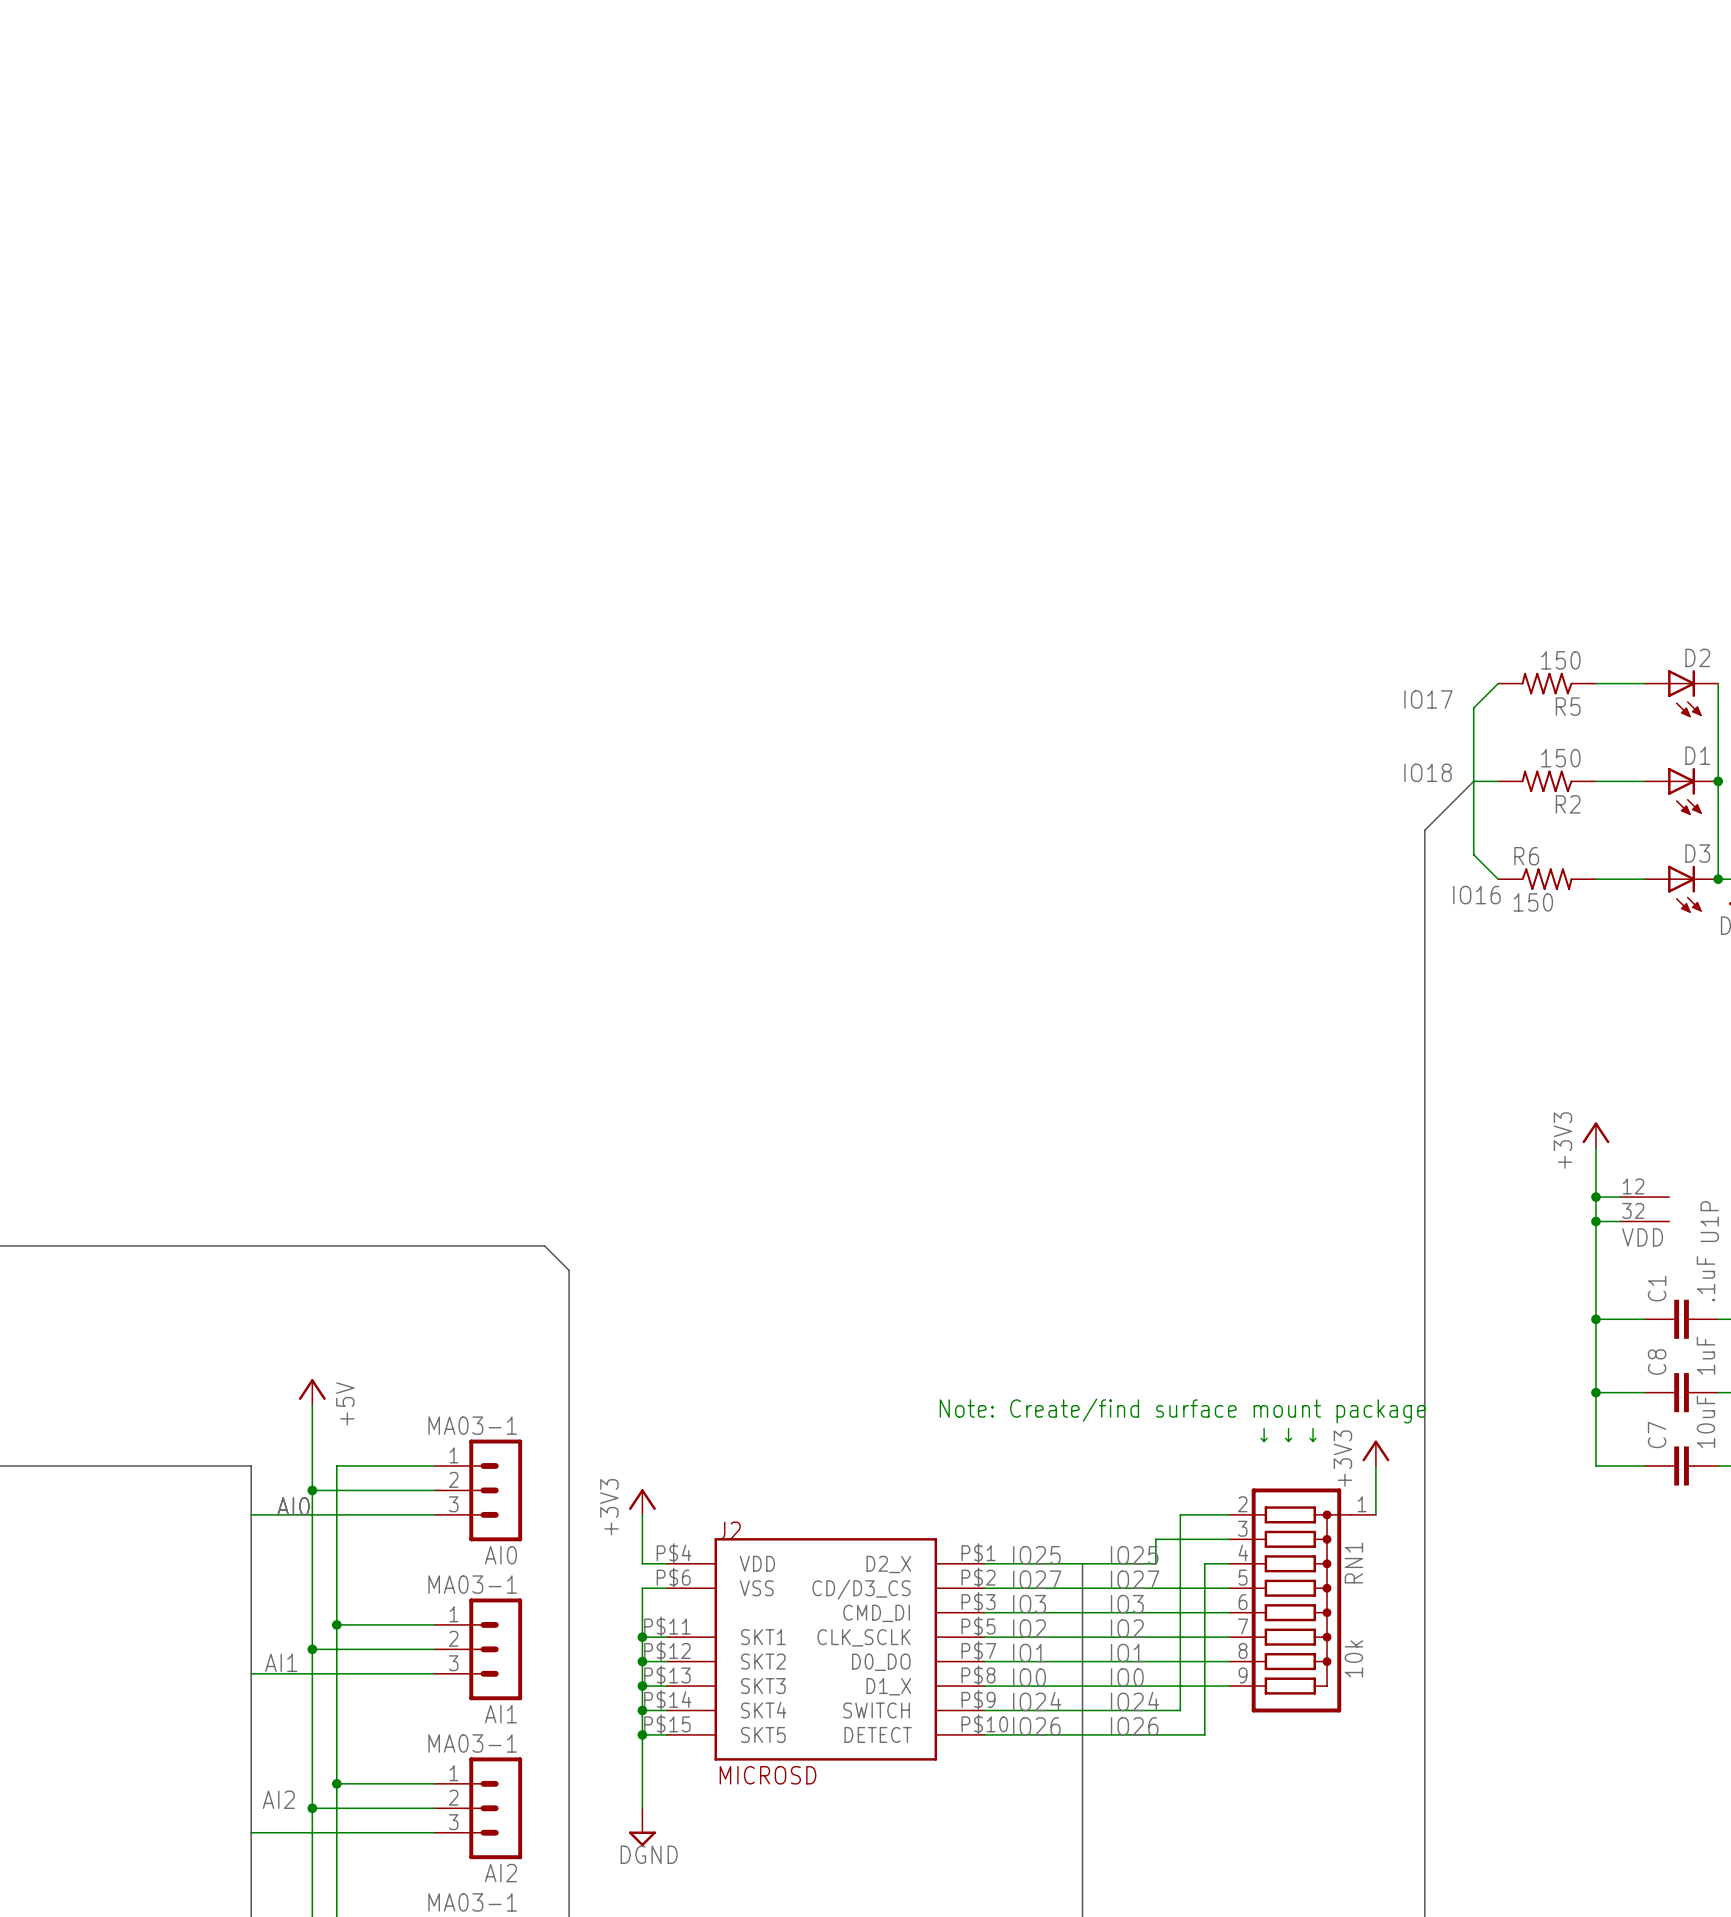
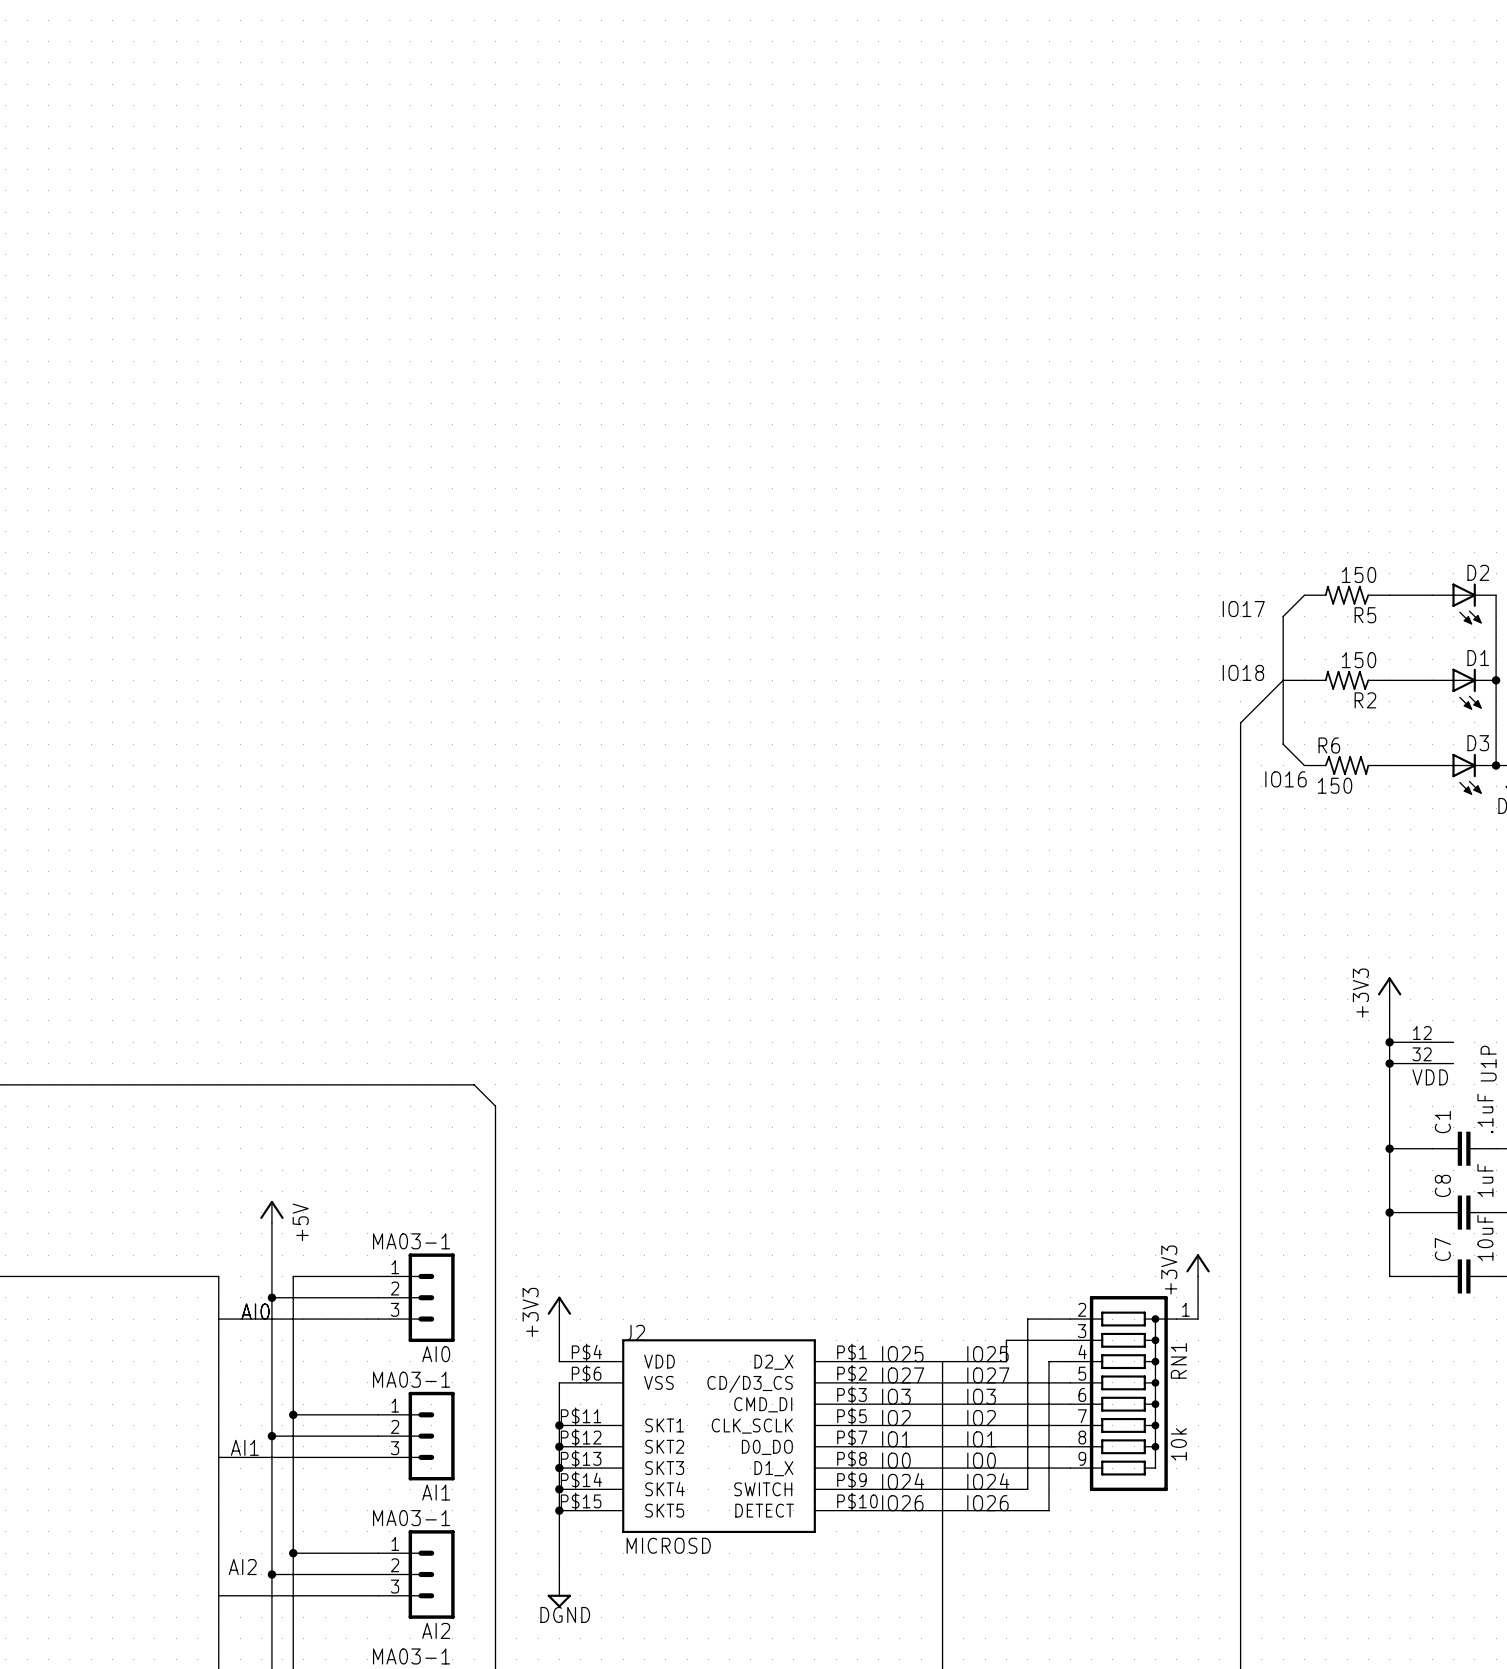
text: Note: Create/find surface mount package (1182, 1410) -> none
text: ↓ (1264, 1435) -> none
text: ↓ (1288, 1435) -> none
text: ↓ (1313, 1435) -> none

